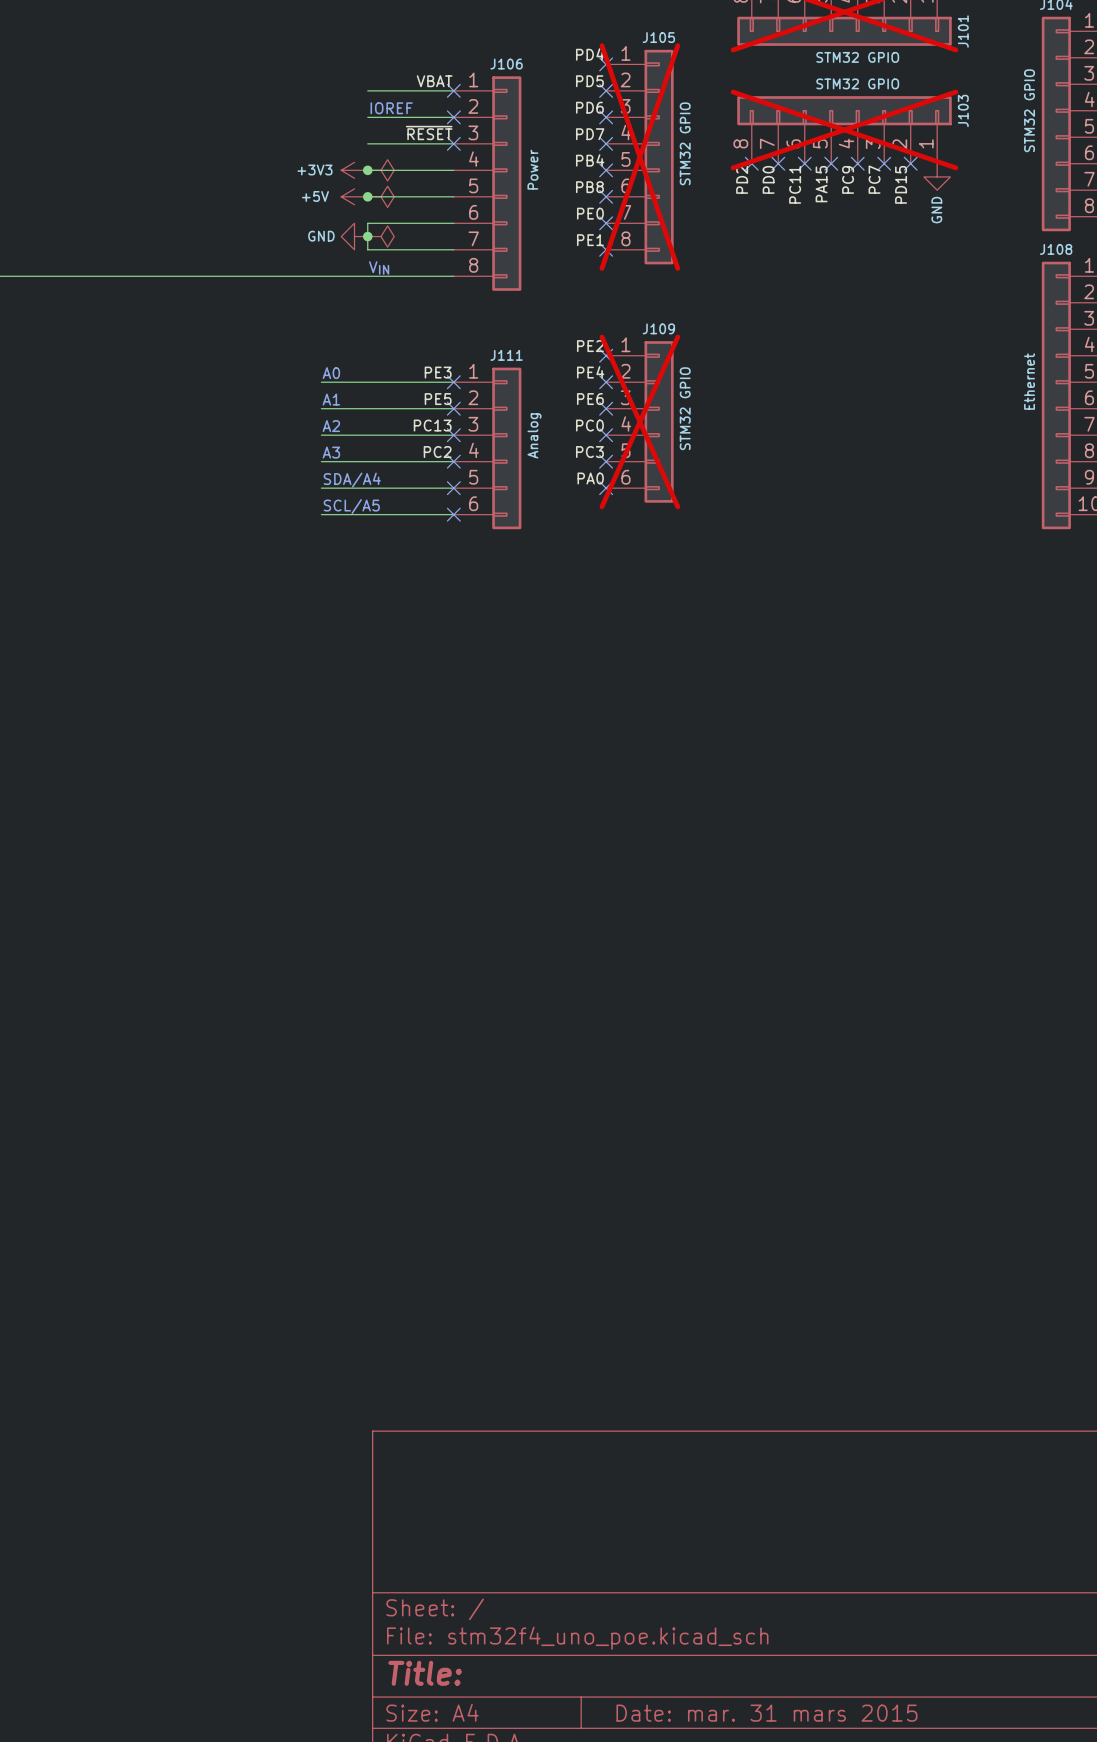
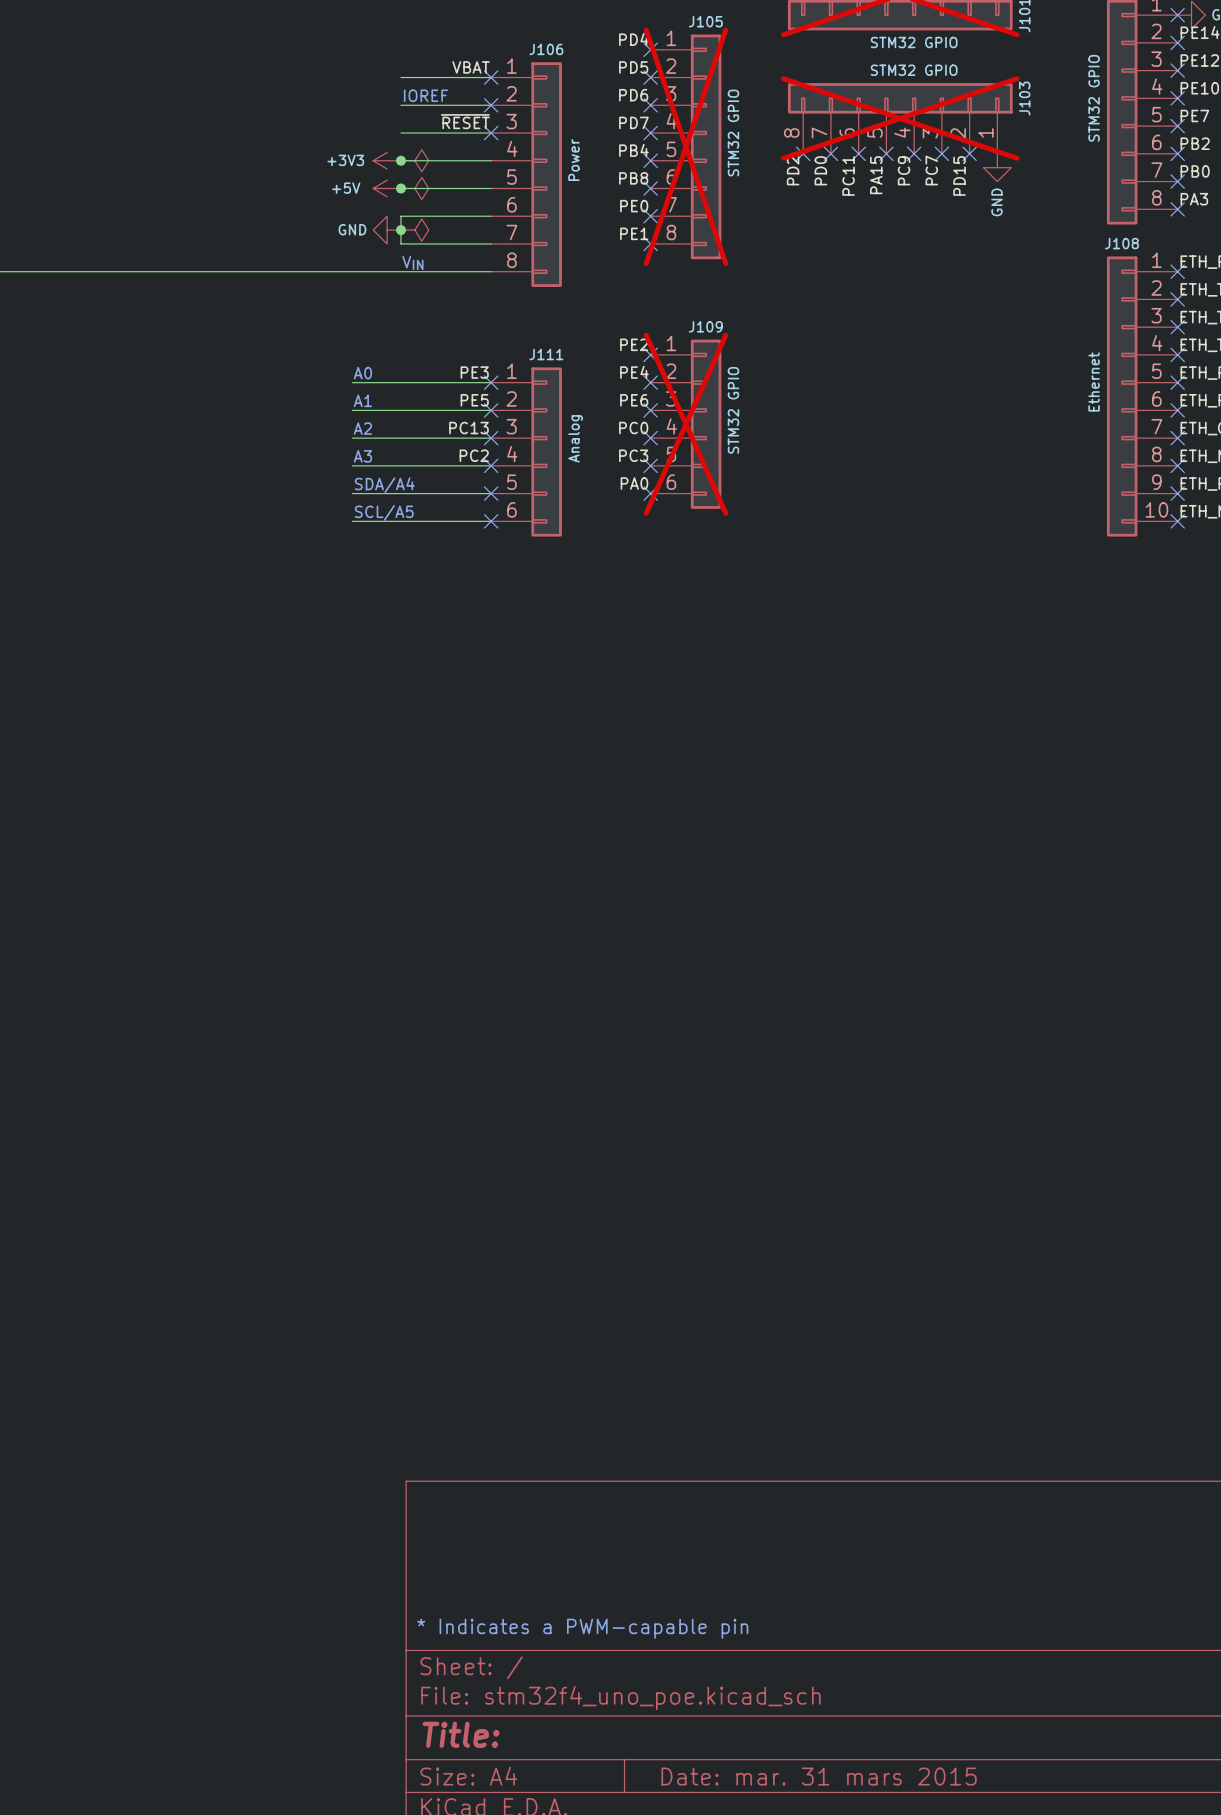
text: none -> * Indicates a PWM-capable pin (582, 1628)

